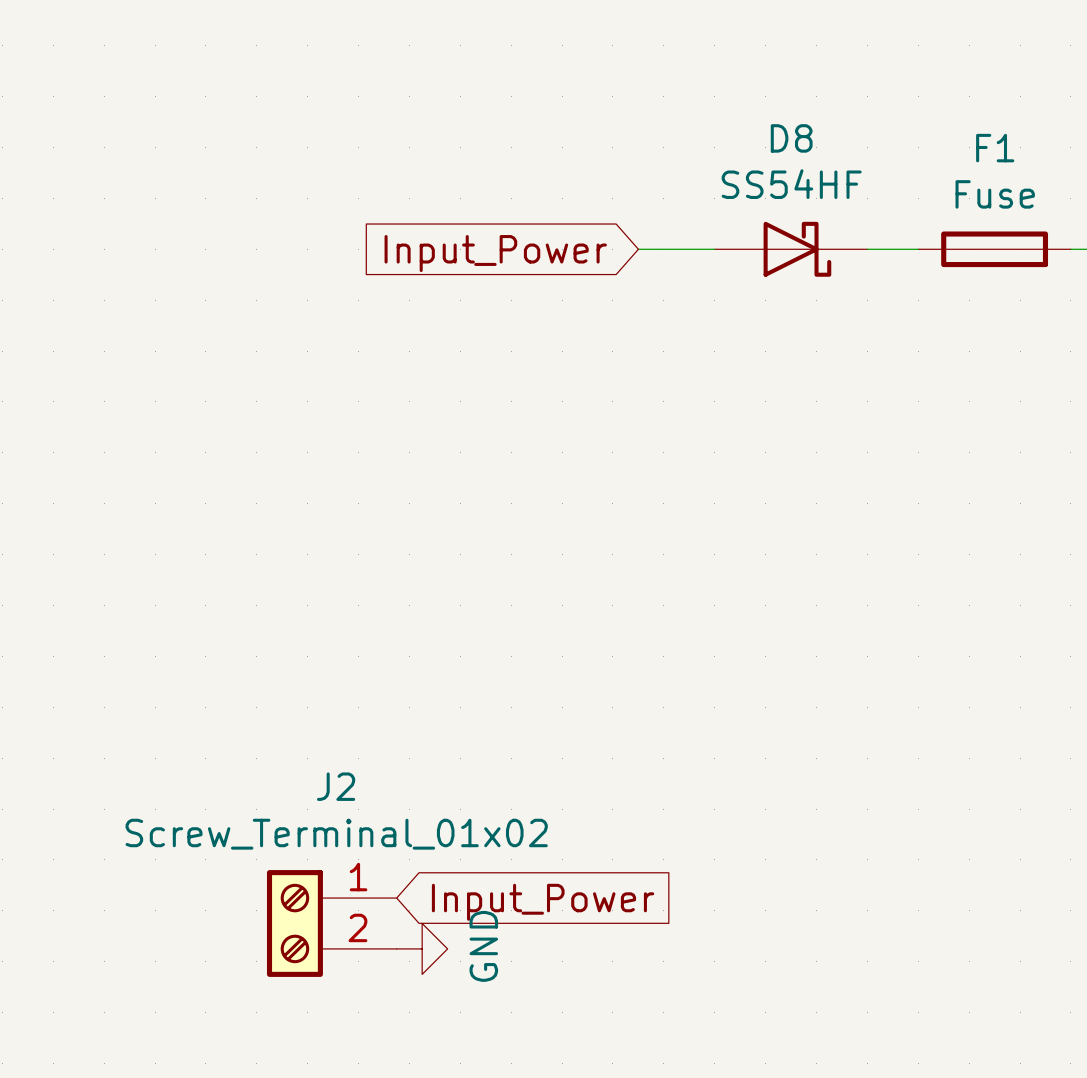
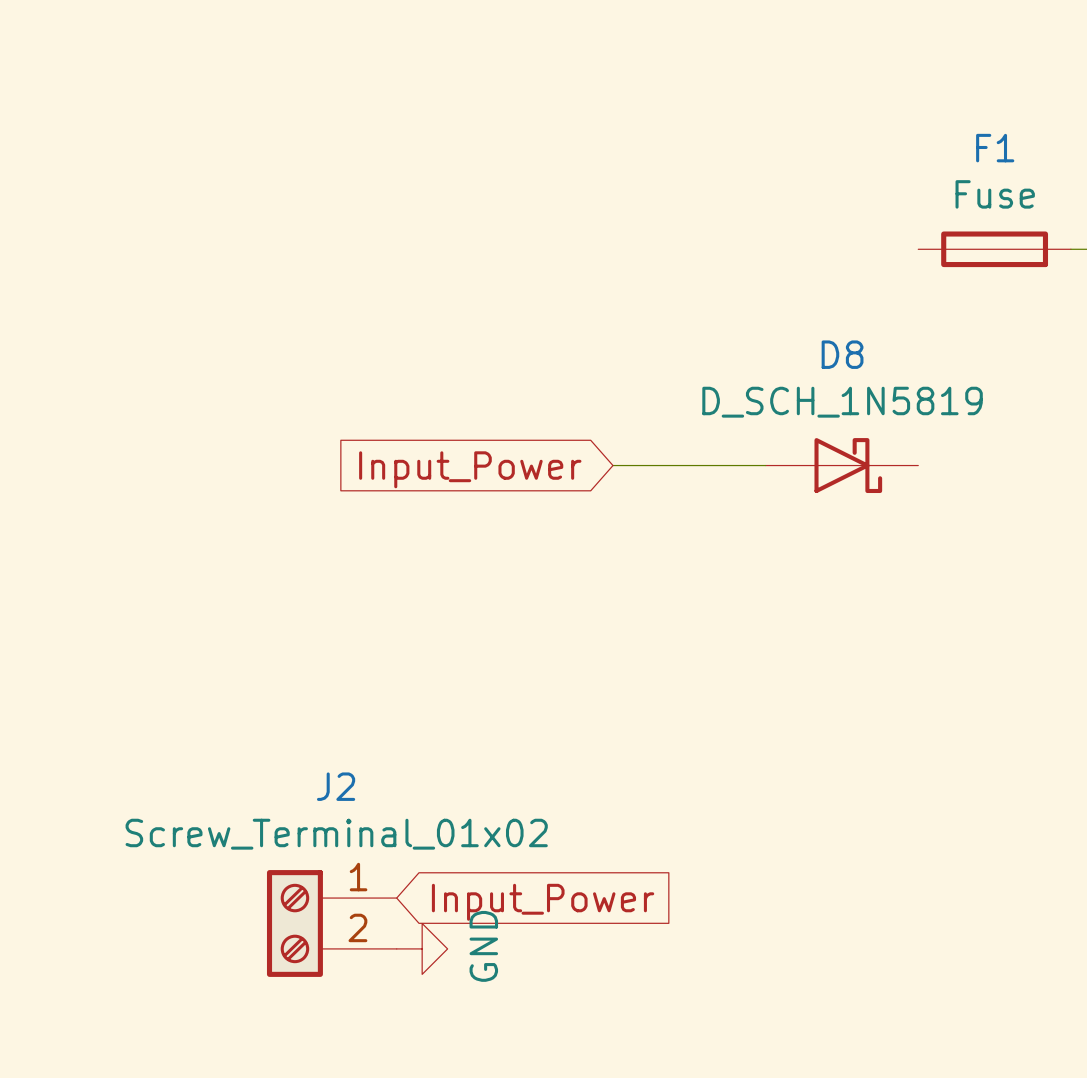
D8 value: SS54HF (791, 184) -> D_SCH_1N5819 (842, 402)
wire: (638, 249) (714, 249) -> none
D8 position: (791, 249) -> (841, 465)
wire: (867, 249) (918, 249) -> none
global label position: Input_Power (495, 253) -> Input_Power (470, 469)
wire: none -> (612, 465) (765, 465)

